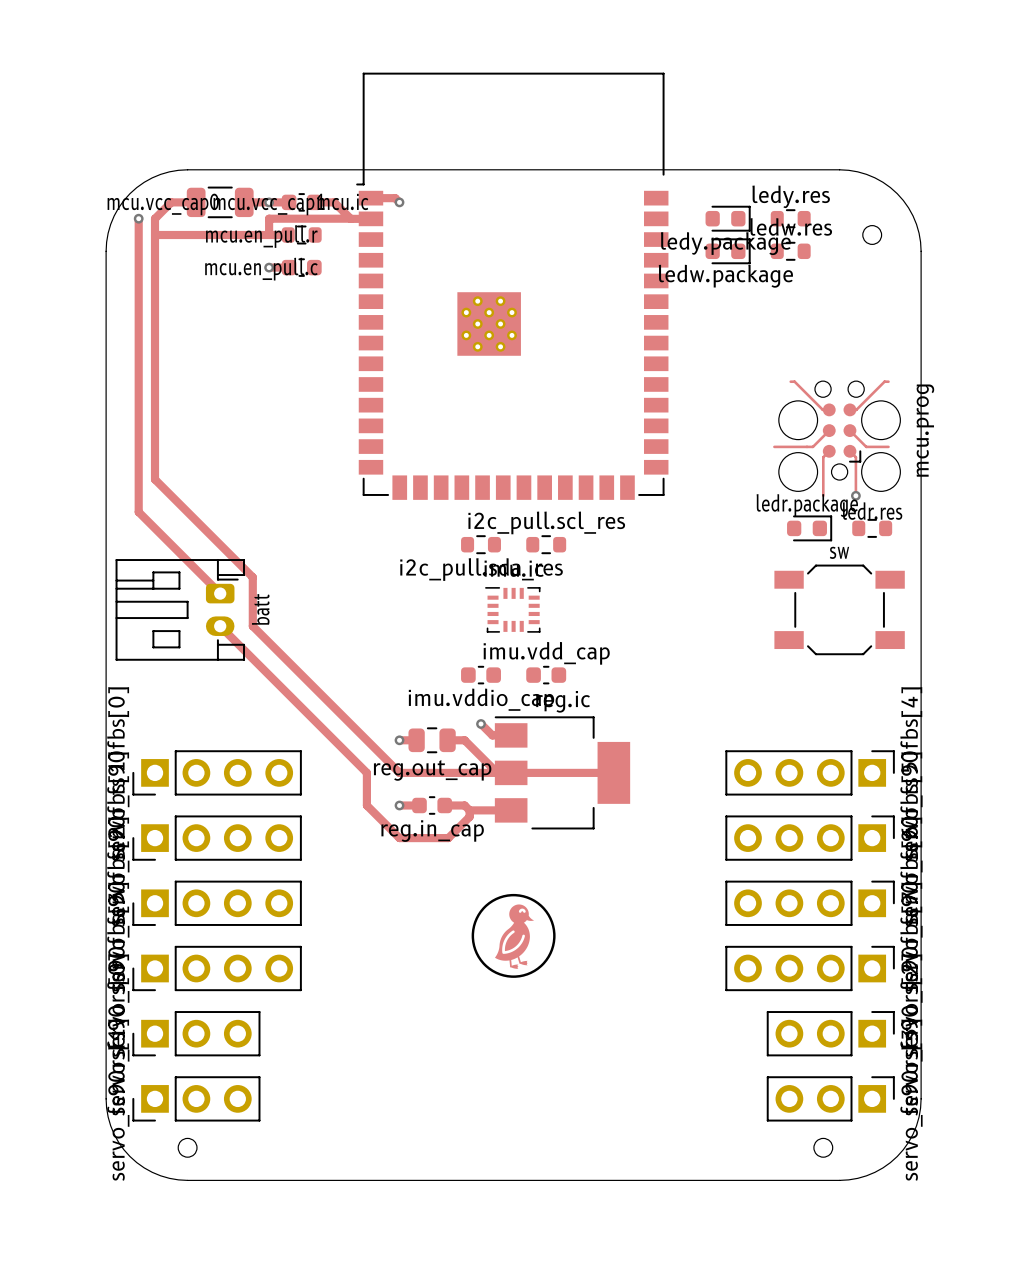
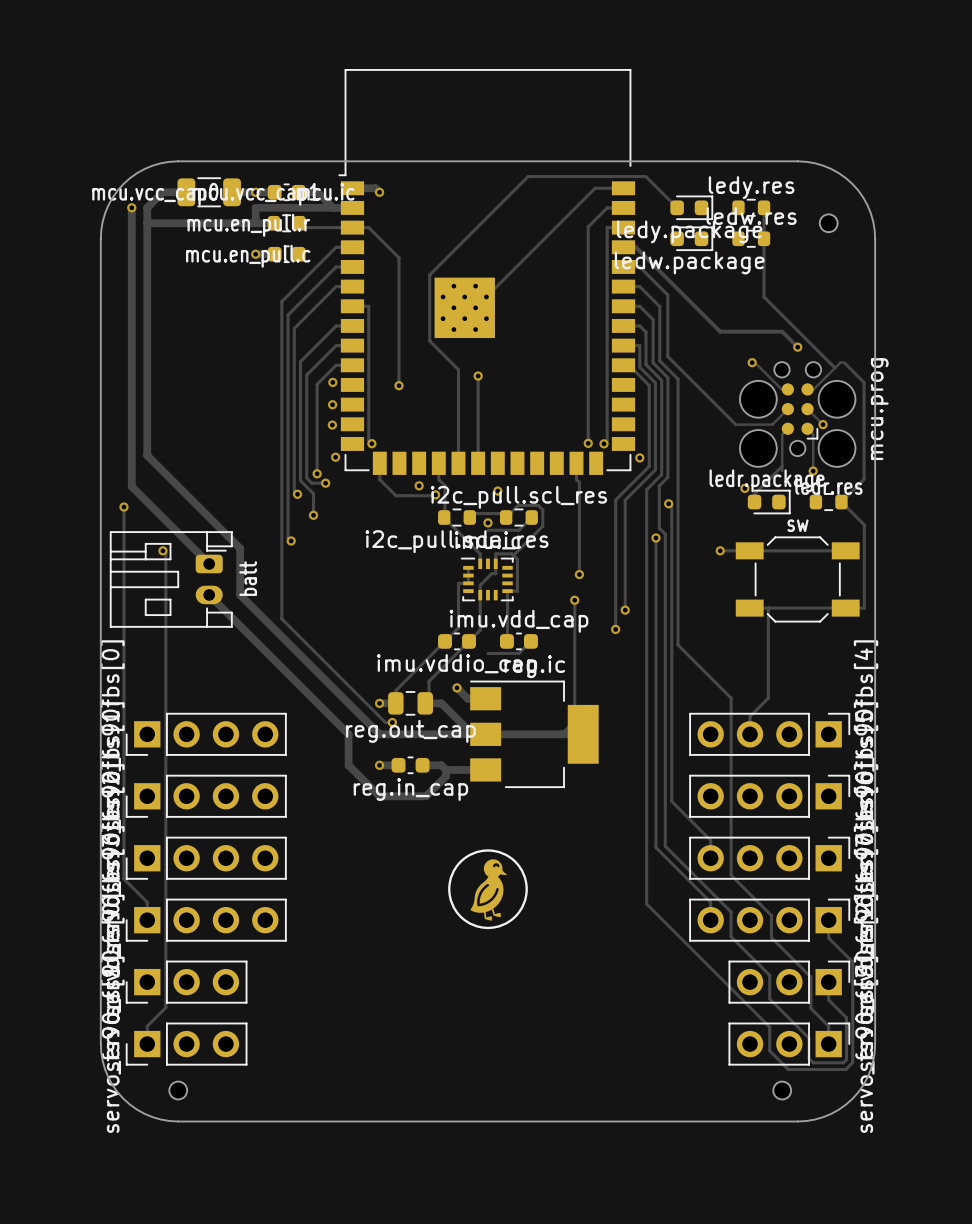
track: none -> (623, 188) (595, 188) (486, 296)
track: none -> (623, 207) (607, 207) (588, 226) (588, 443)
track: none -> (677, 207) (645, 176) (528, 176) (429, 274) (429, 340) (458, 369) (458, 463)
track: none -> (764, 207) (764, 296) (835, 368)
track: none -> (299, 223) (303, 227) (368, 227) (398, 257) (398, 385)
track: none -> (623, 227) (607, 227) (607, 440) (603, 443)
track: none -> (352, 247) (336, 247) (281, 301) (281, 618) (385, 722) (392, 722)
track: none -> (623, 247) (635, 247) (720, 331) (782, 331) (797, 347)
track: none -> (352, 266) (336, 266) (288, 315) (288, 537) (291, 540)
track: none -> (623, 266) (639, 266) (667, 294) (667, 356) (735, 424)
track: none -> (352, 286) (336, 286) (294, 328) (294, 491) (297, 494)
track: none -> (623, 286) (639, 286) (659, 306) (659, 360) (678, 379) (678, 644) (731, 698) (731, 875) (771, 915) (771, 937) (810, 977) (810, 1008) (828, 1026) (828, 1044)
track: none -> (352, 306) (368, 306) (368, 440) (371, 443)
track: none -> (623, 306) (639, 306) (653, 319) (653, 362) (667, 377) (667, 477) (659, 485) (659, 528) (665, 534) (665, 846) (731, 911) (731, 936) (769, 975) (769, 998) (809, 1038) (809, 1058) (813, 1062) (843, 1062) (846, 1059) (846, 1017) (828, 999) (828, 982)
track: none -> (352, 325) (336, 325) (300, 361) (300, 480) (313, 493) (313, 515)
track: none -> (623, 325) (639, 325) (646, 332) (646, 364) (661, 380) (661, 474) (646, 489) (646, 904) (769, 1027) (769, 1050) (788, 1069) (845, 1069) (852, 1062) (852, 962) (828, 938) (828, 920)
track: none -> (352, 345) (336, 345) (306, 375) (306, 478) (311, 483) (325, 483)
track: none -> (623, 345) (639, 345) (639, 367) (655, 382) (655, 469) (625, 500) (625, 610)
via: none -> (797, 347)
via: none -> (752, 362)
track: none -> (844, 362) (864, 382) (864, 479) (841, 502) (864, 524) (864, 608) (749, 608)
track: none -> (352, 365) (336, 365) (317, 384) (317, 473)
track: none -> (623, 365) (629, 365) (649, 385) (649, 466) (615, 500) (615, 629)
track: none -> (478, 376) (478, 463)
via: none -> (478, 376)
via: none -> (332, 382)
via: none -> (398, 385)
via: none -> (332, 404)
track: (866, 446) (888, 446) -> none
via: none -> (823, 424)
via: none -> (332, 425)
via: none -> (588, 443)
via: none -> (371, 443)
via: none -> (603, 443)
via: none -> (335, 457)
via: none -> (639, 457)
track: none -> (379, 463) (379, 479) (395, 495) (435, 494)
track: none -> (438, 463) (438, 479) (444, 485) (444, 517) (480, 553) (480, 563)
track: none -> (576, 463) (576, 479) (579, 482) (579, 574)
track: none -> (782, 466) (754, 493) (754, 502)
via: none -> (317, 473)
via: none -> (325, 483)
via: none -> (419, 485)
via: none -> (744, 488)
via: none -> (497, 491)
via: none -> (297, 494)
via: none -> (435, 494)
track: none -> (668, 503) (671, 506) (671, 801) (710, 840) (710, 858)
via: none -> (668, 503)
track: none -> (123, 506) (123, 879) (147, 902) (147, 920)
via: none -> (123, 506)
via: none -> (313, 515)
track: none -> (469, 517) (473, 513) (502, 513) (506, 517) (518, 505) (538, 505) (542, 509) (542, 526) (513, 555)
track: none -> (531, 517) (518, 530) (487, 530)
via: none -> (487, 522)
track: none -> (655, 537) (655, 847) (710, 902) (710, 920)
via: none -> (655, 537)
via: none -> (291, 540)
track: none -> (162, 550) (165, 553) (165, 1007) (147, 1026) (147, 1044)
via: none -> (162, 550)
track: none -> (720, 550) (845, 550)
via: none -> (720, 550)
track: none -> (468, 567) (468, 583) (458, 583) (458, 627) (395, 690) (395, 703)
via: none -> (579, 574)
track: none -> (574, 600) (574, 720) (561, 734)
via: none -> (574, 600)
track: none -> (768, 608) (768, 698) (750, 716) (750, 734)
via: none -> (625, 610)
via: none -> (615, 629)
track: none -> (506, 641) (507, 591) (517, 591) (517, 559) (512, 553) (495, 553) (495, 573) (491, 573) (480, 585) (480, 630) (429, 681) (429, 703)
track: none -> (530, 641) (518, 653) (487, 653)
via: none -> (392, 722)

